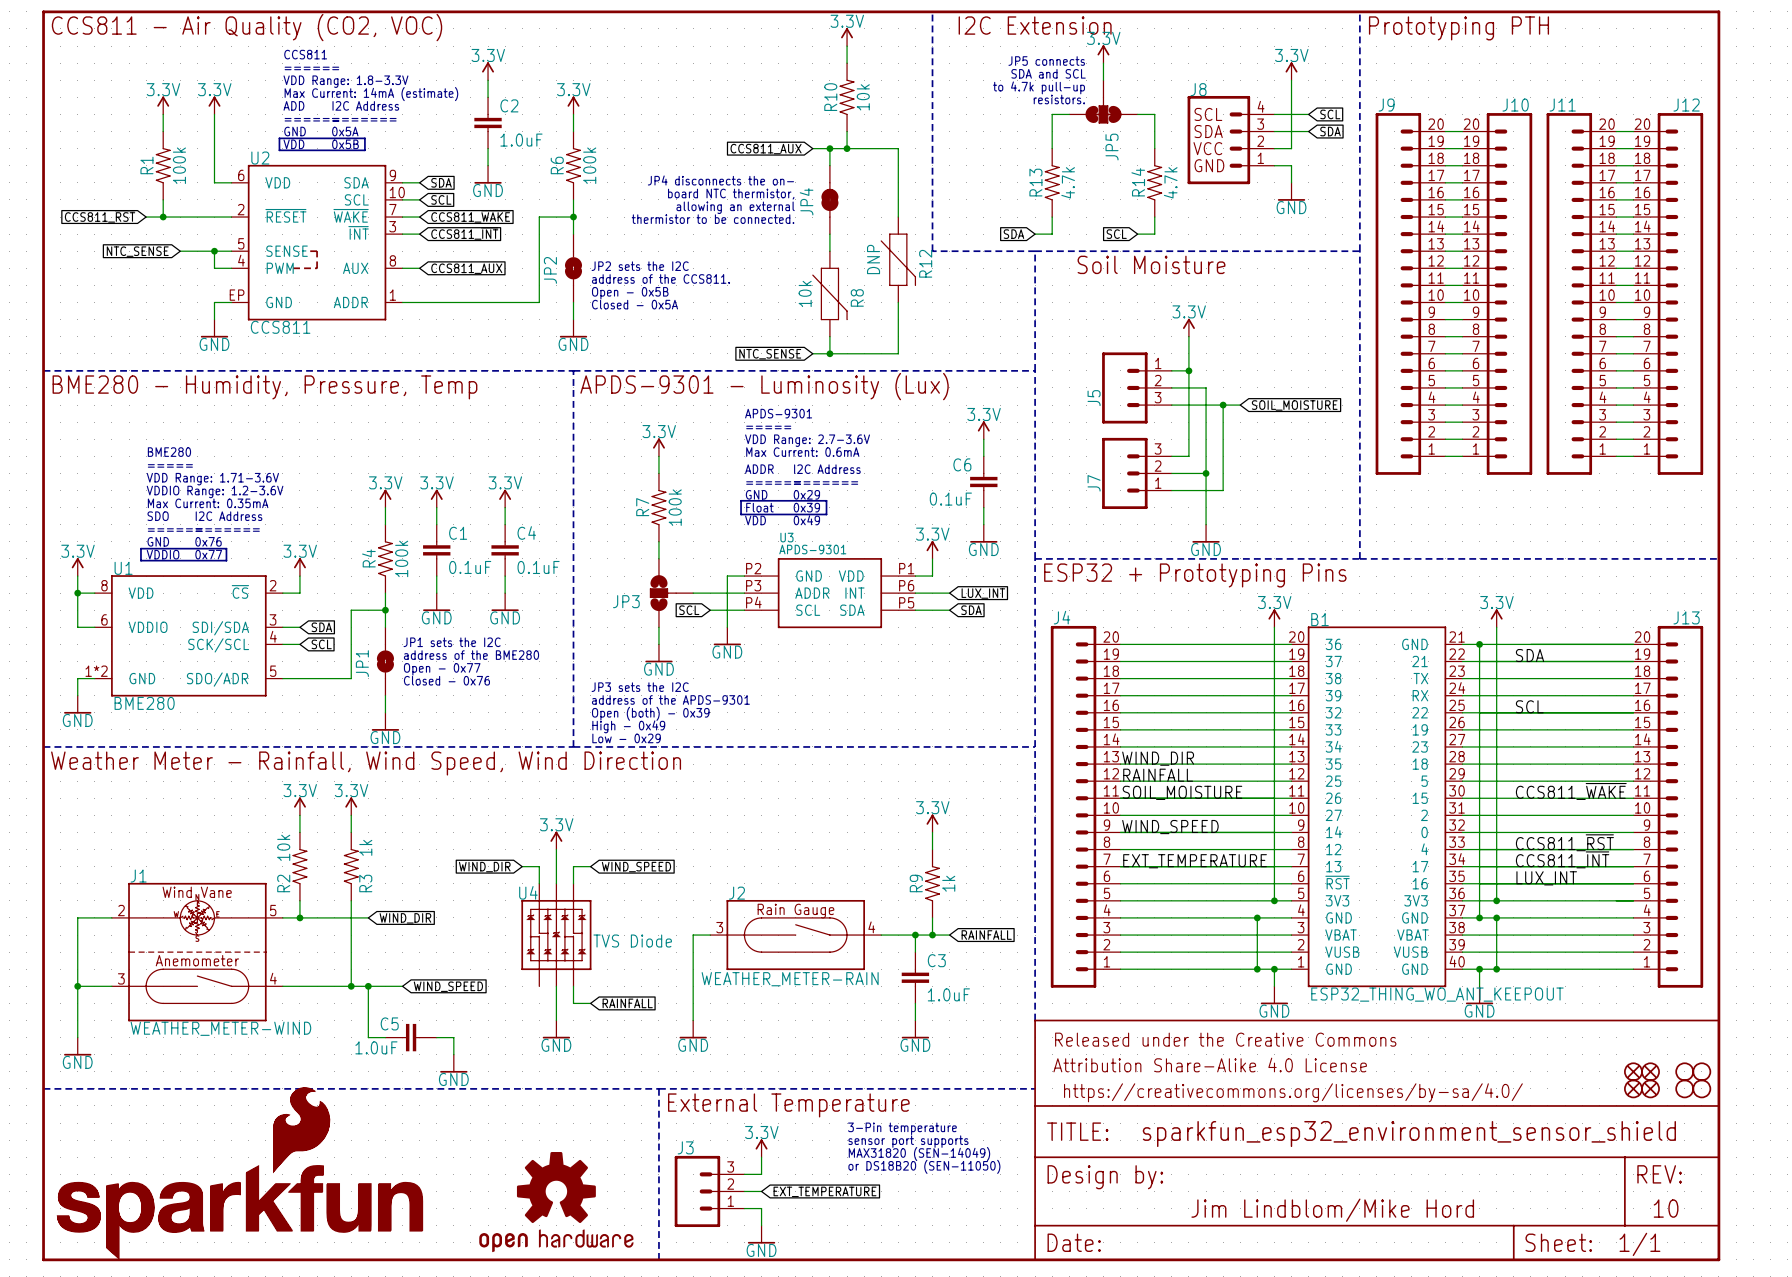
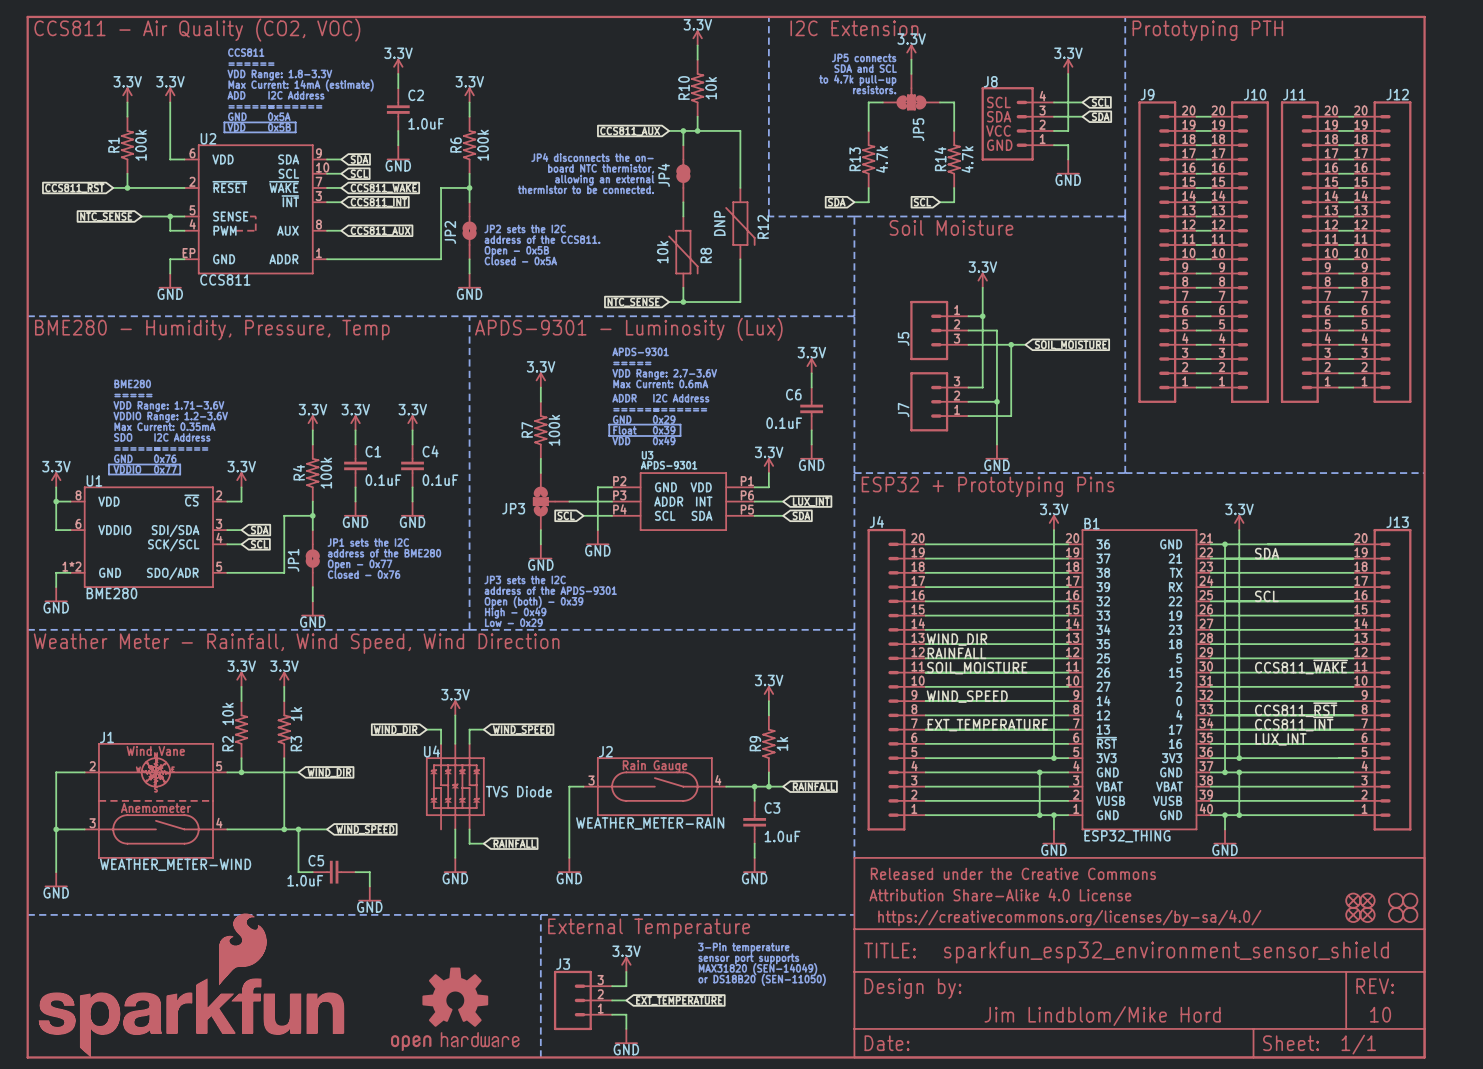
B1 value: ESP32_THING_WO_ANT_KEEPOUT (1437, 994) -> ESP32_THING (1127, 836)

